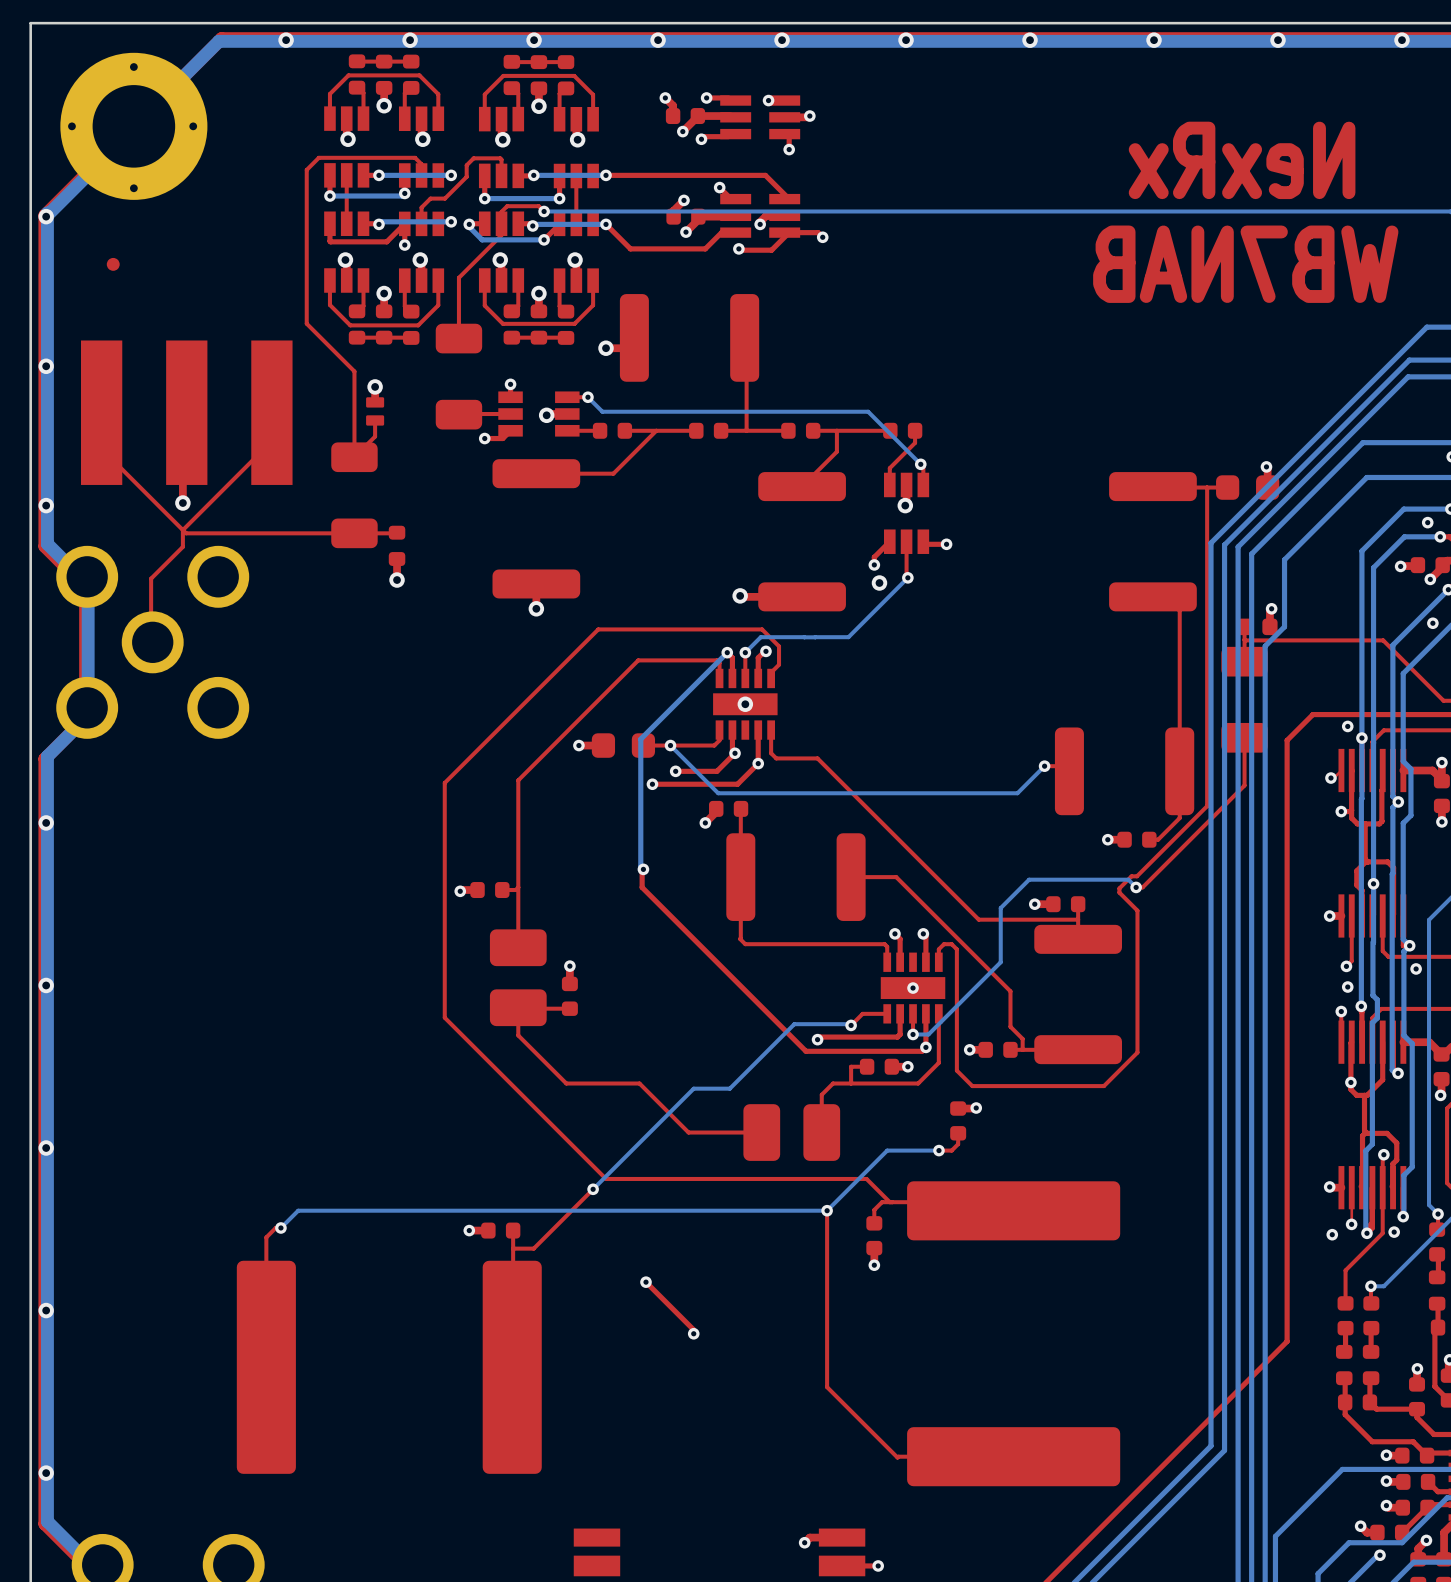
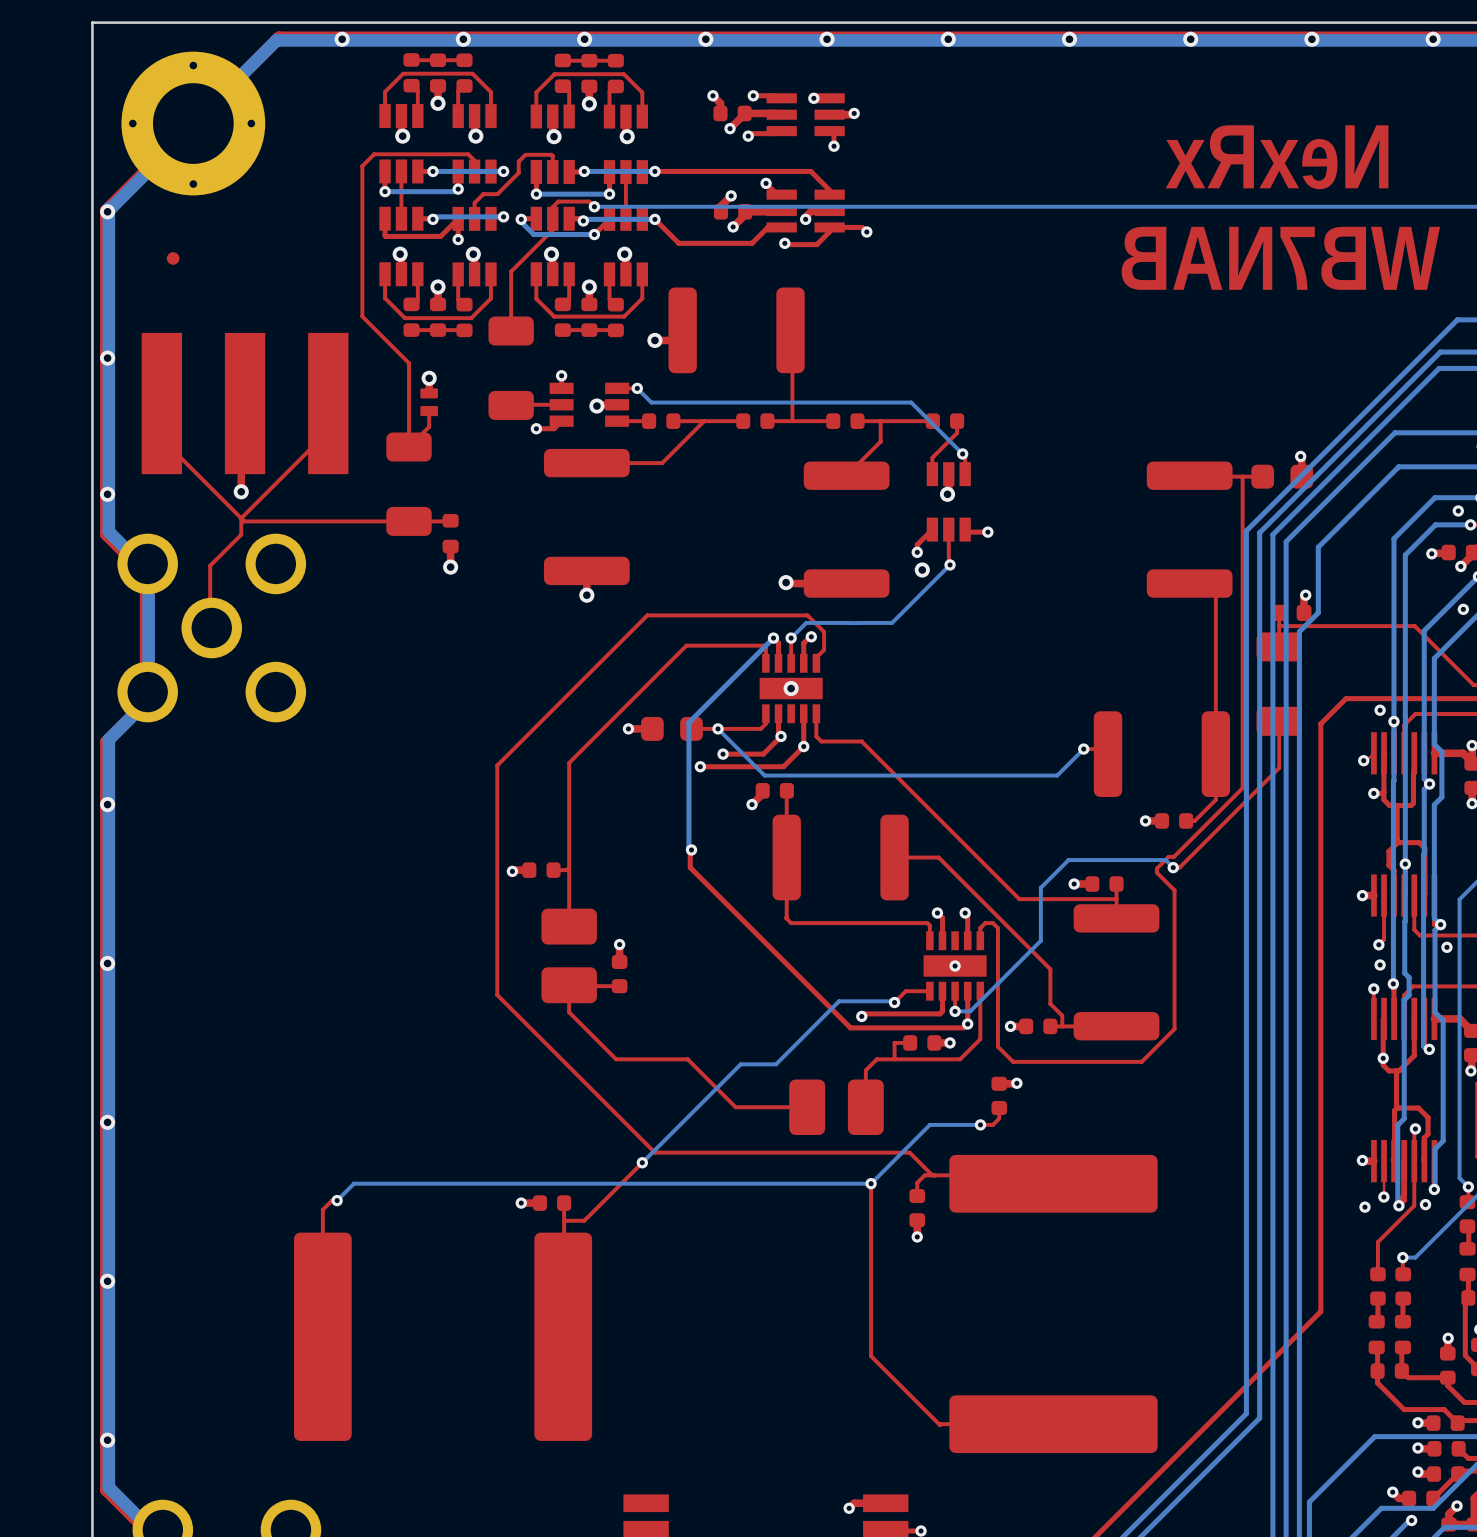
top track: (646, 1282) (693, 1329) (693, 1333) -> none
via: (646, 1282) -> none
via: (693, 1333) -> none

